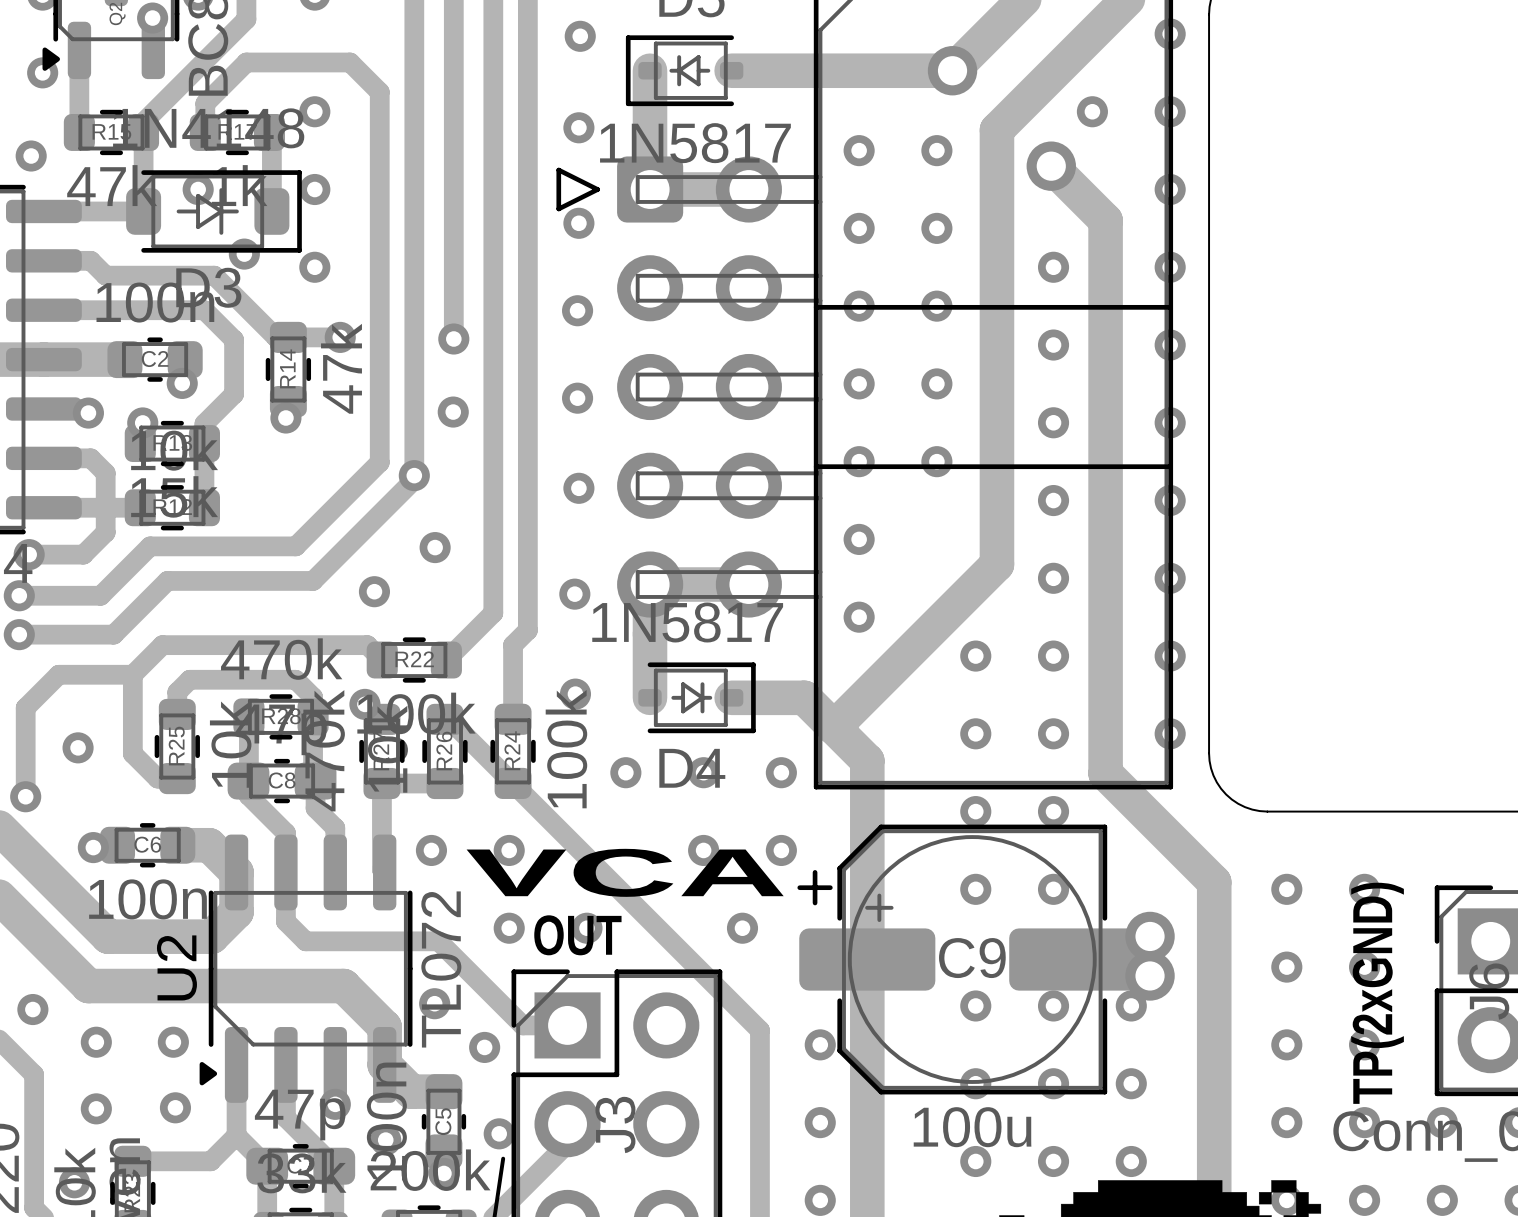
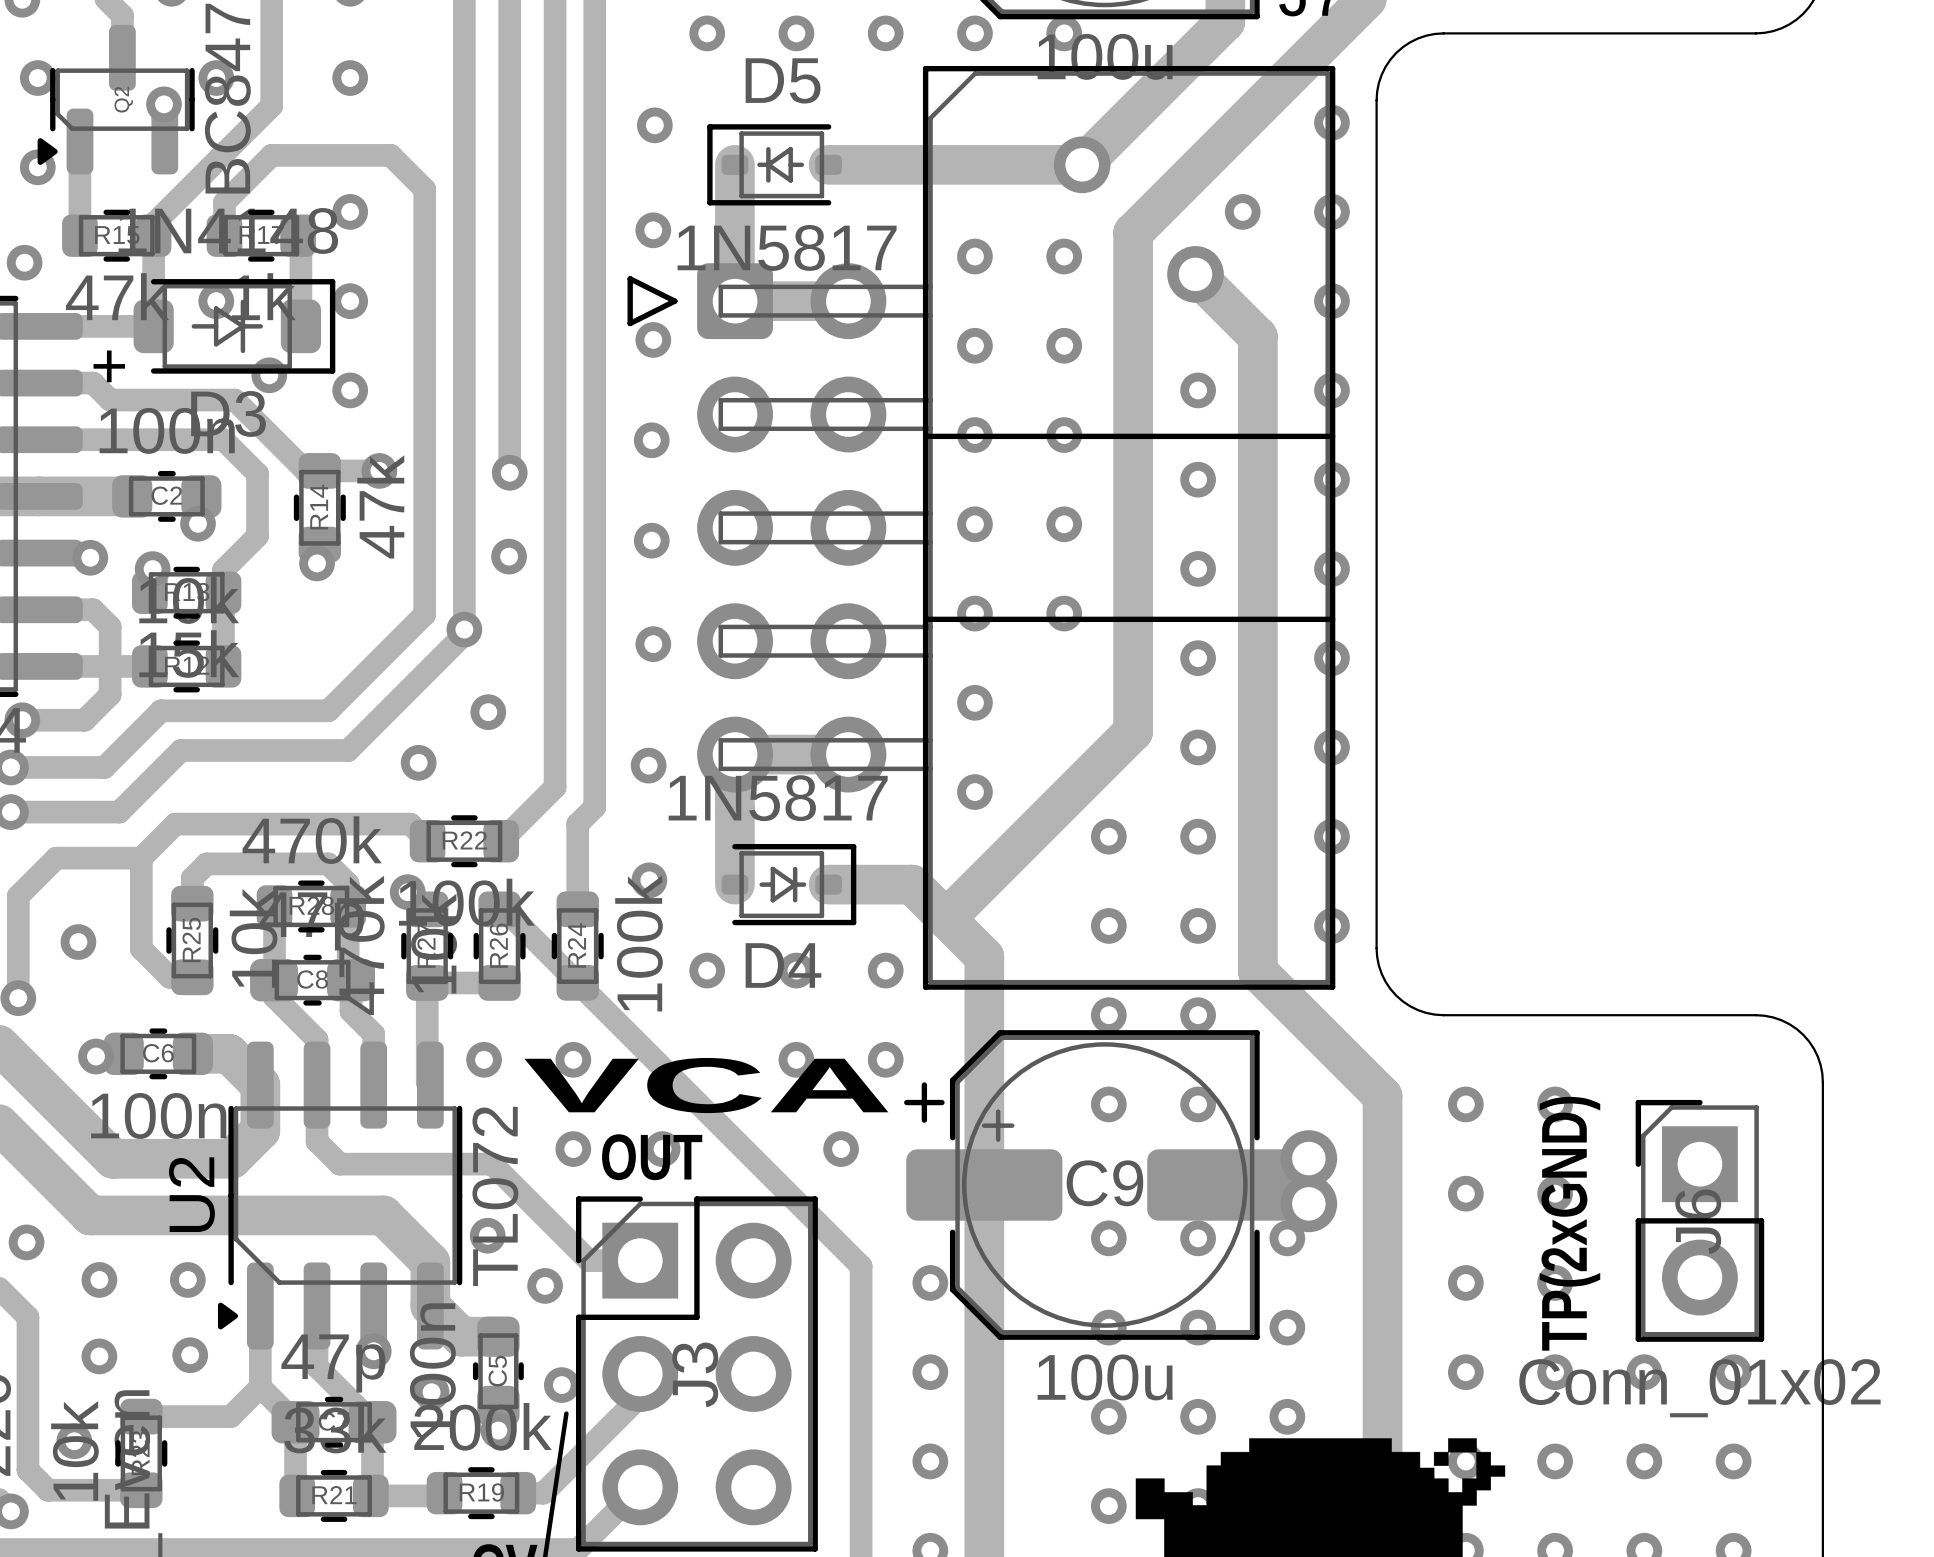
text: none -> + (109, 366)

